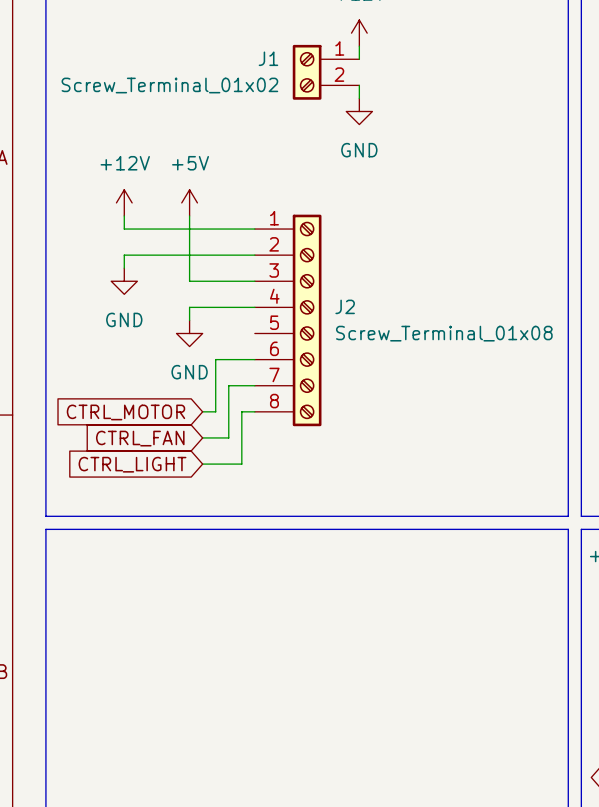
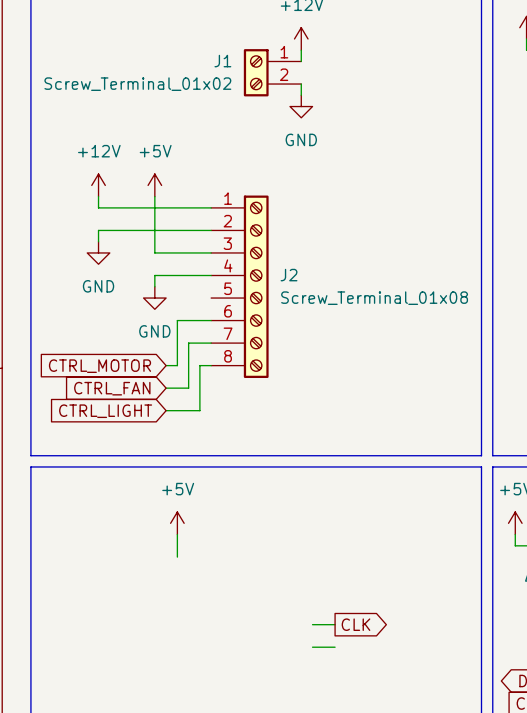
power symbol: none -> +5V (177, 523)
wire: none -> (177, 534) (177, 557)
wire: none -> (312, 624) (335, 624)
global label: none -> CLK (356, 624)
wire: none -> (312, 647) (335, 647)

